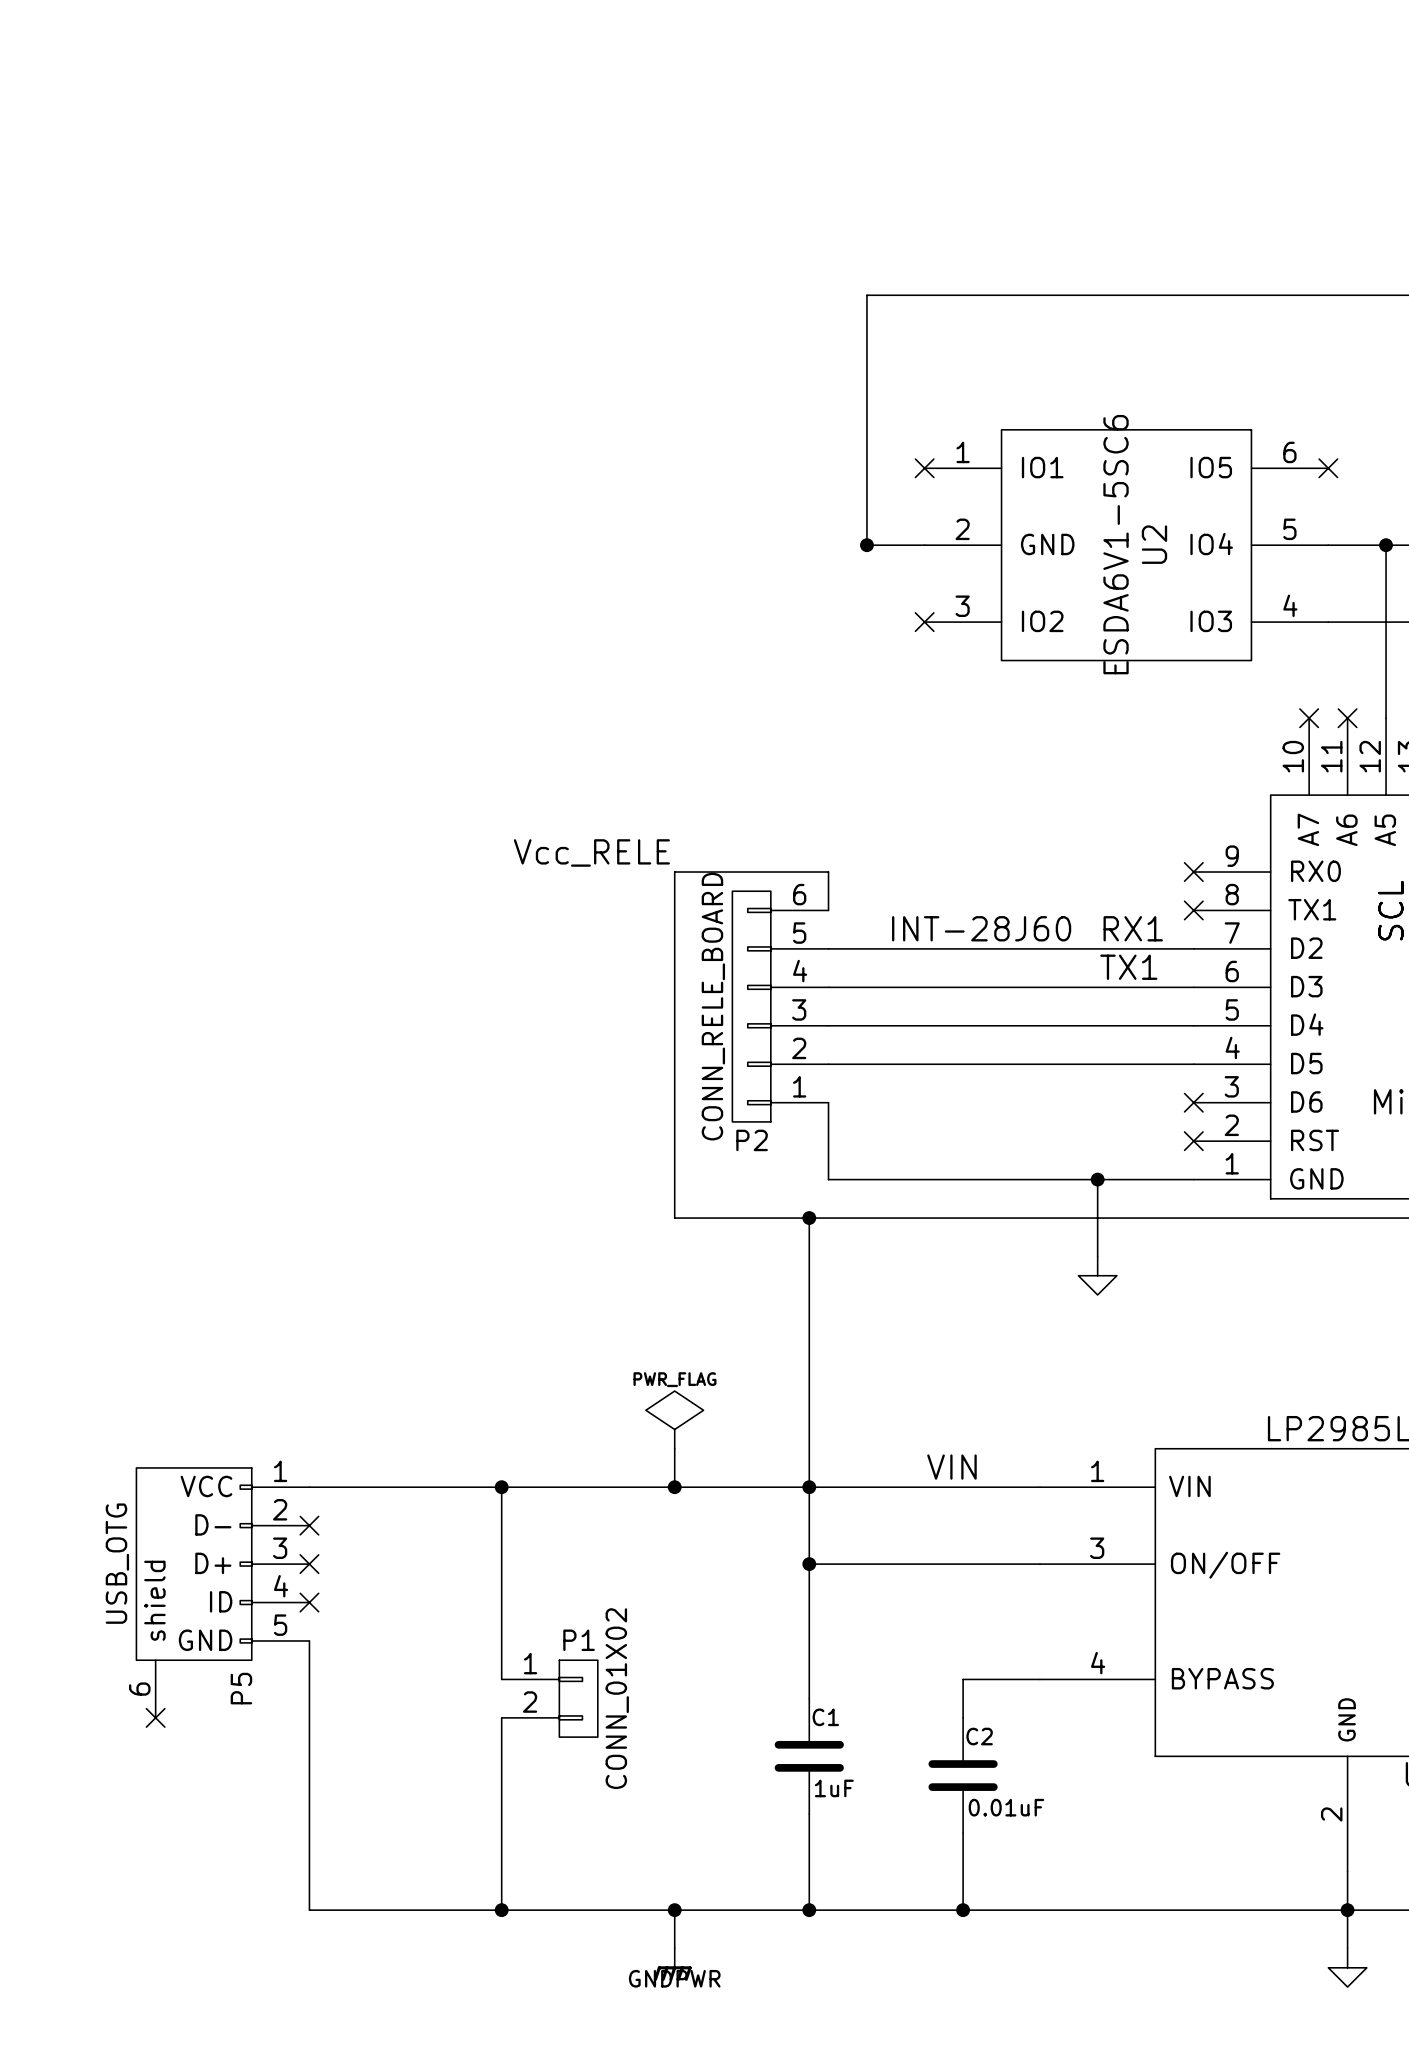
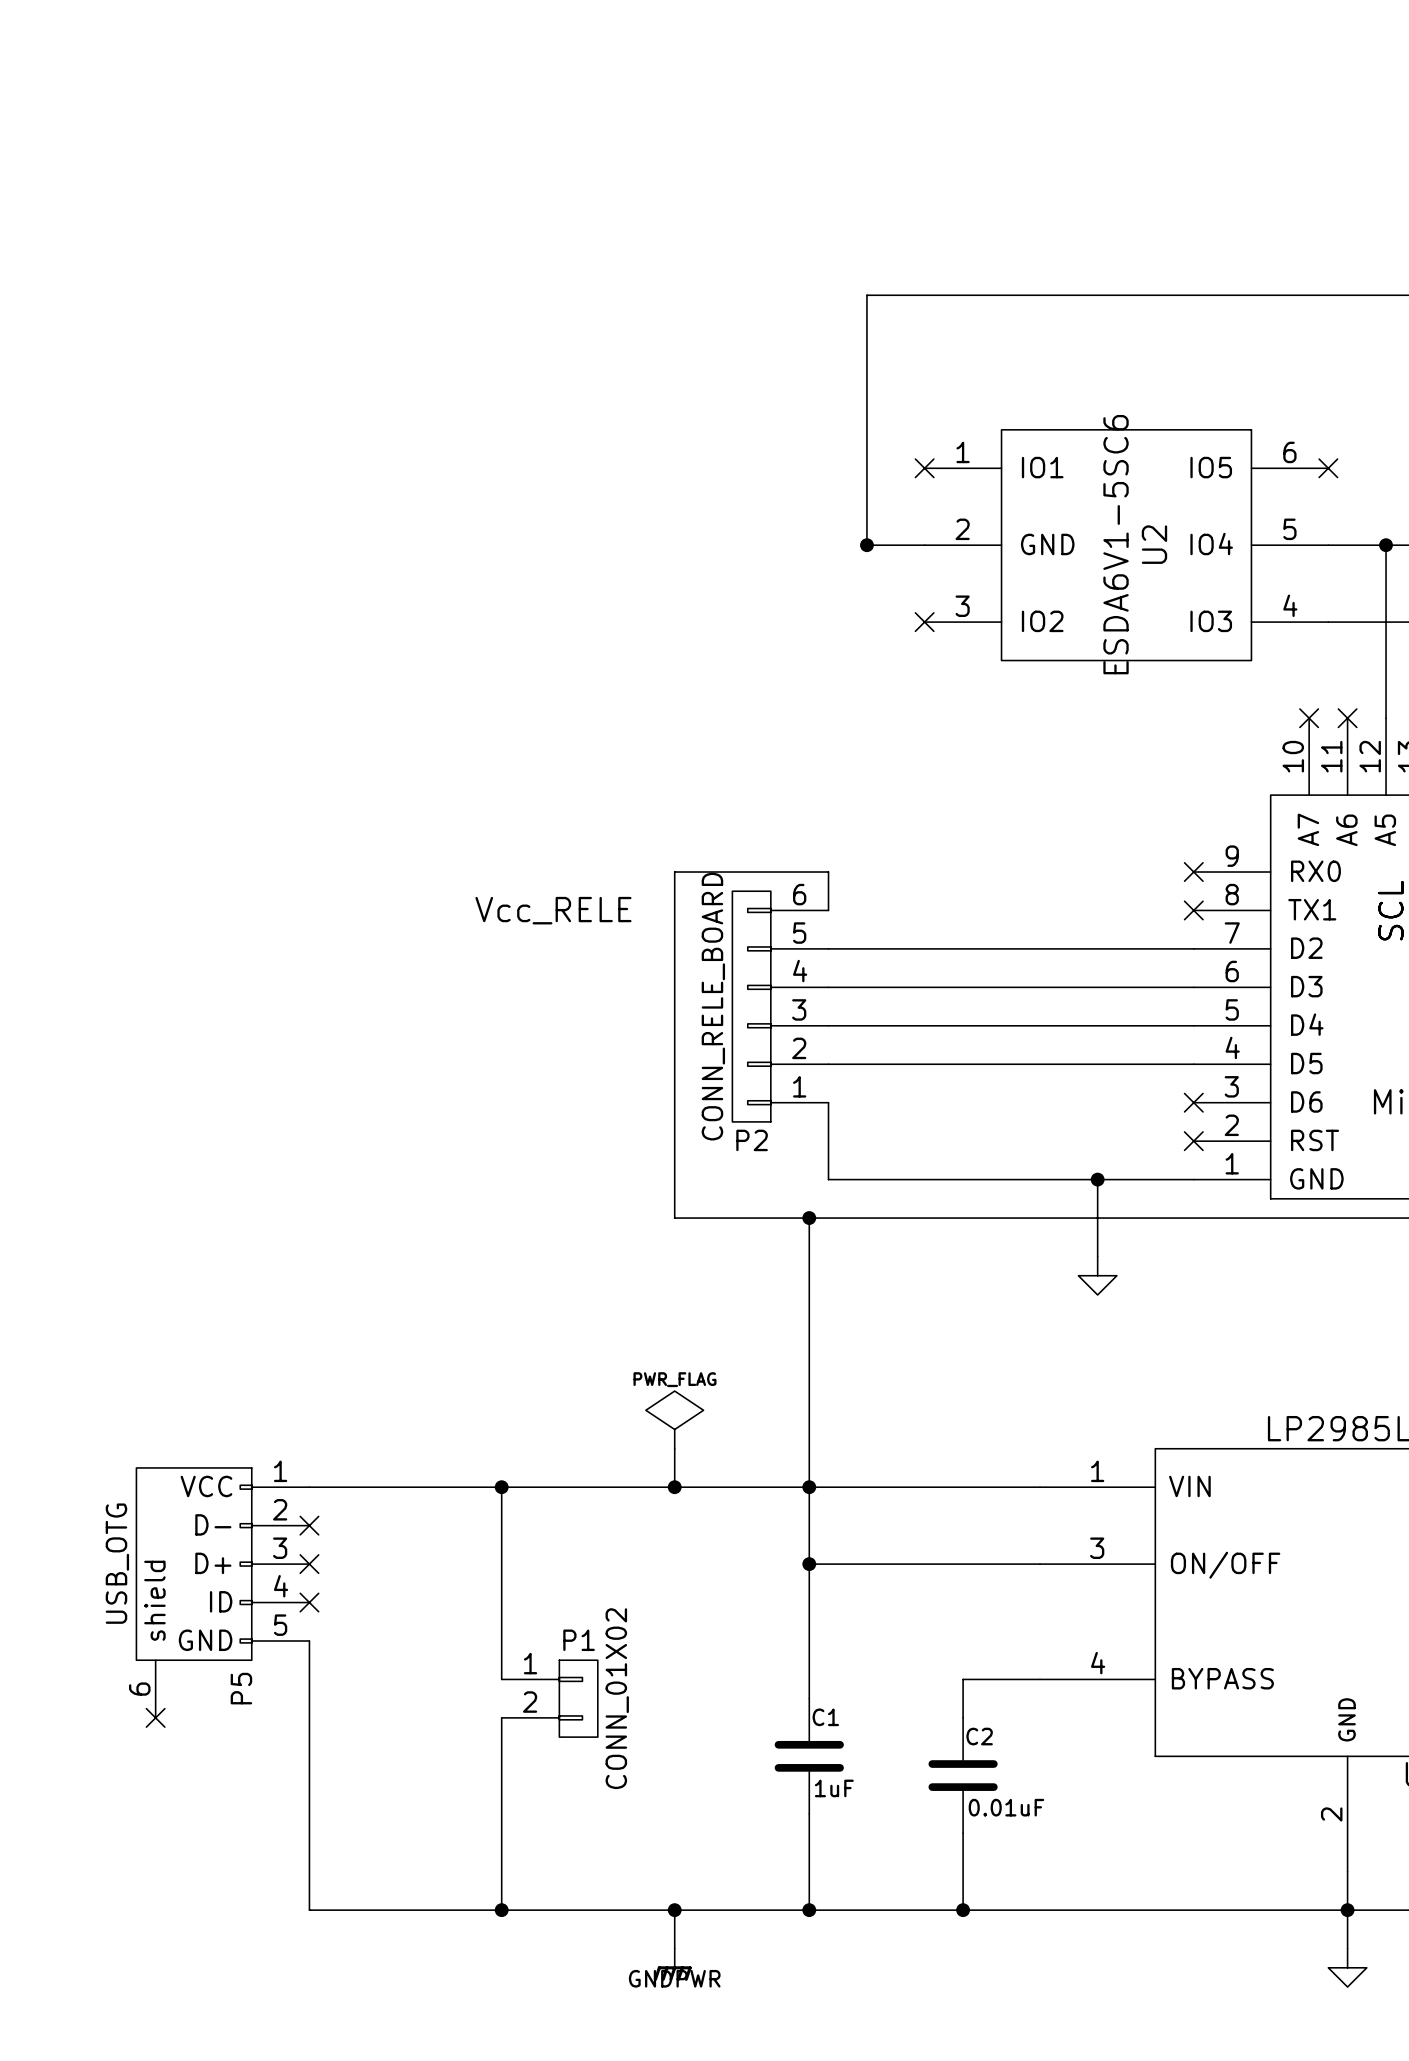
label position: Vcc_RELE (591, 852) -> Vcc_RELE (553, 910)
label: INT-28J60 (981, 928) -> none
label: RX1 (1133, 928) -> none
label: TX1 (1128, 967) -> none
label: VIN (951, 1467) -> none

